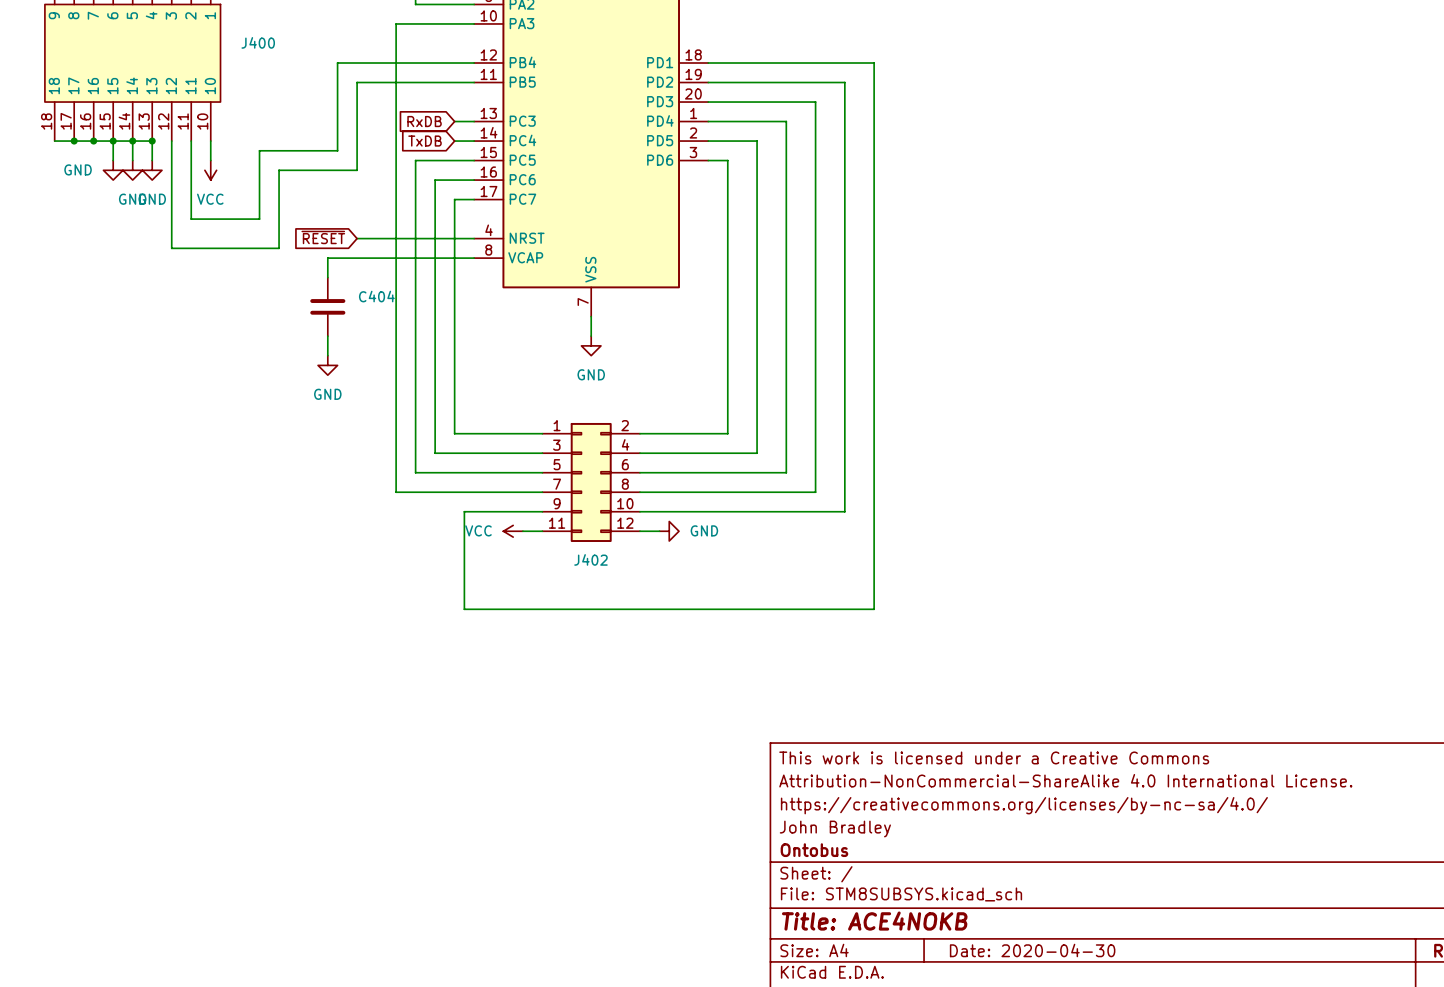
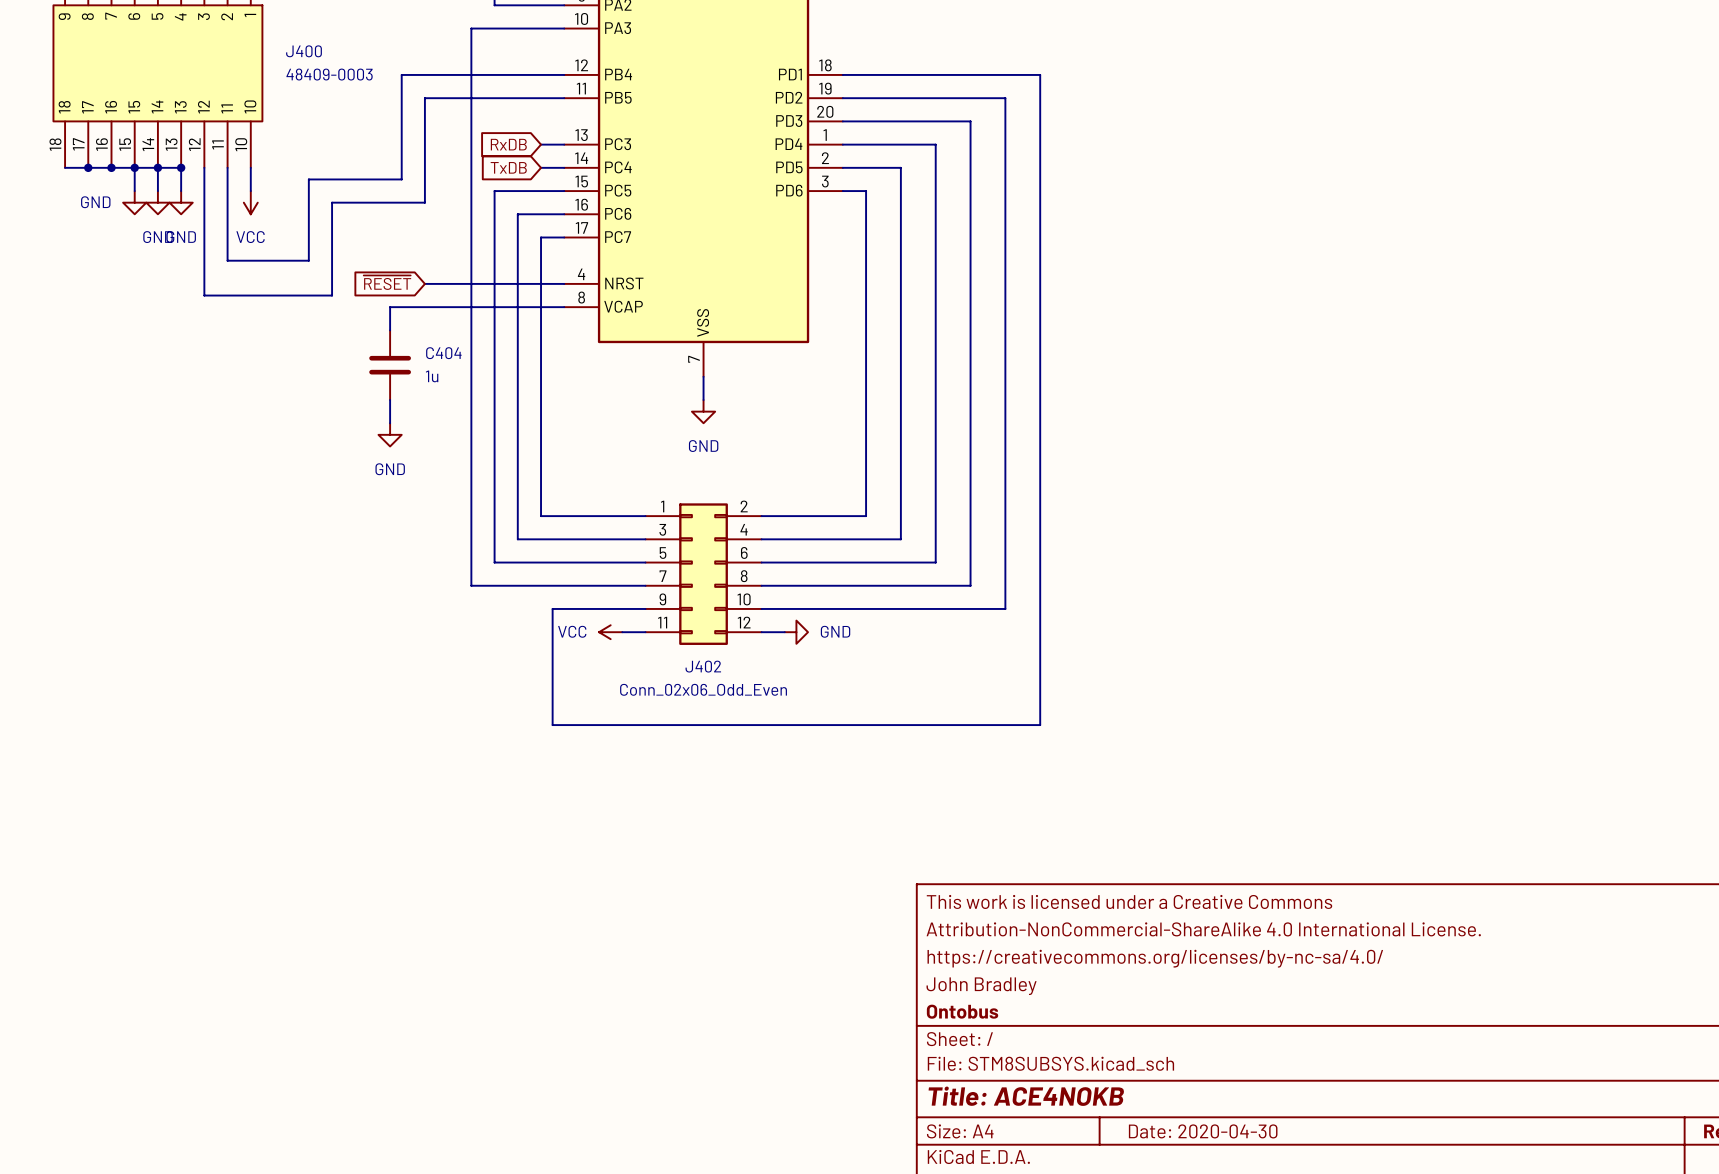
J400 value: none -> 48409-0003 (329, 74)
C404 value: none -> 1u (432, 376)
J402 value: none -> Conn_02x06_Odd_Even (703, 689)

